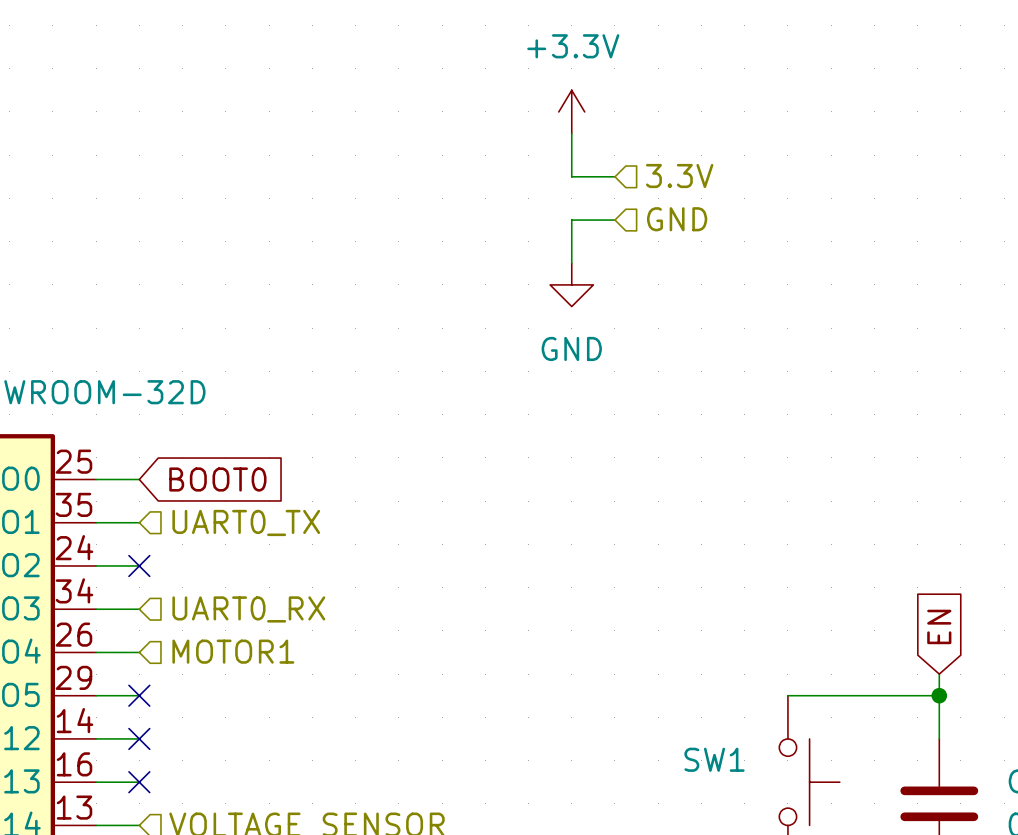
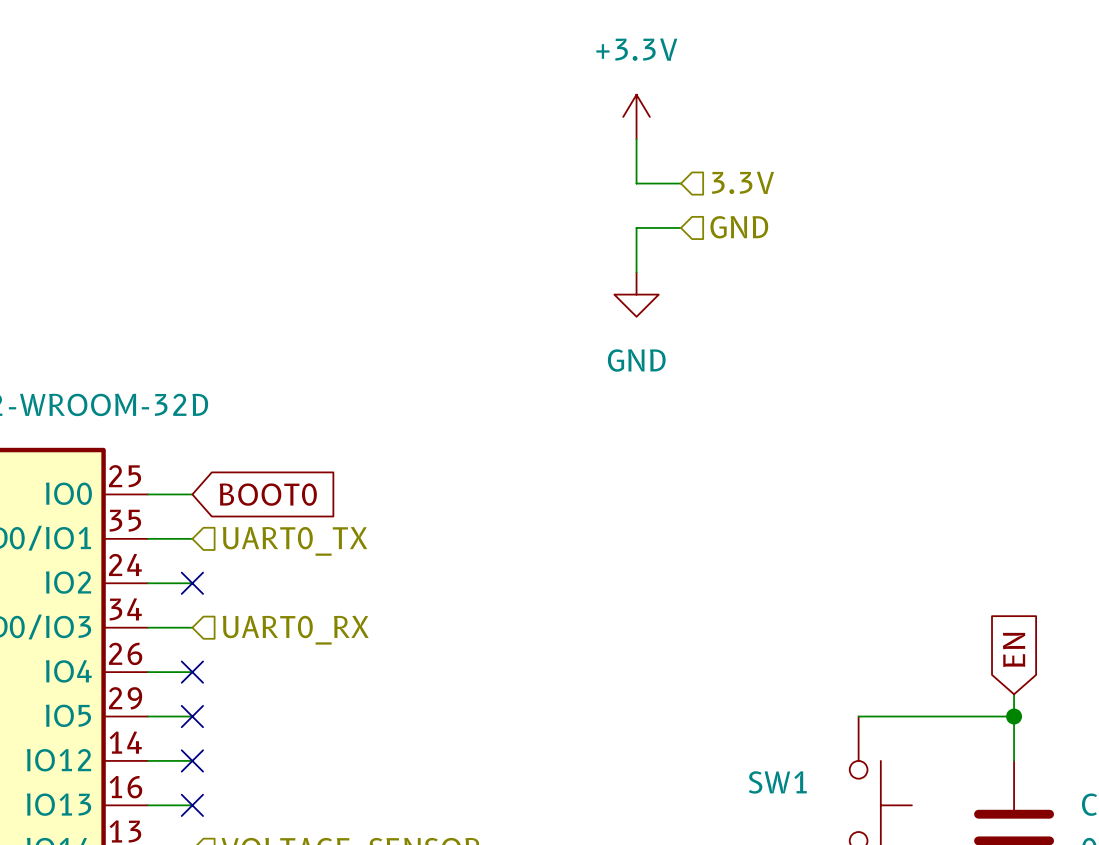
hierarchical label: MOTOR1 (233, 651) -> none
no-connect mark: none -> (192, 672)

